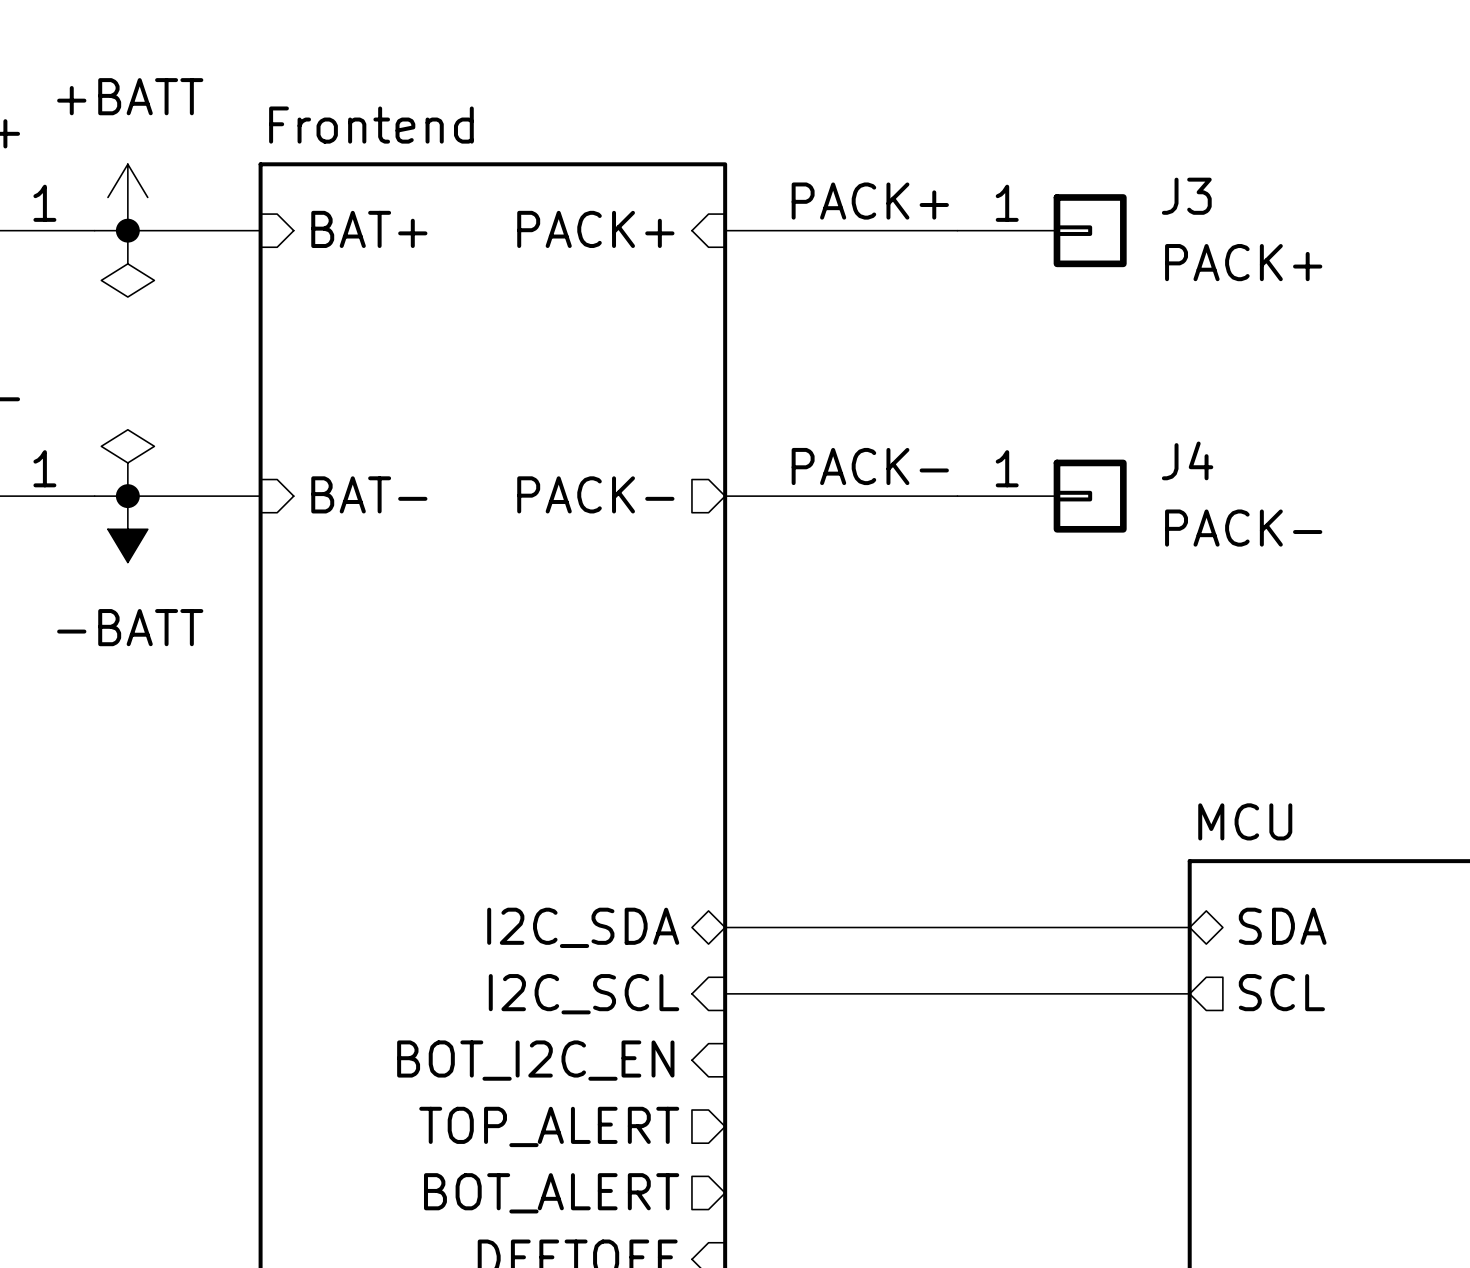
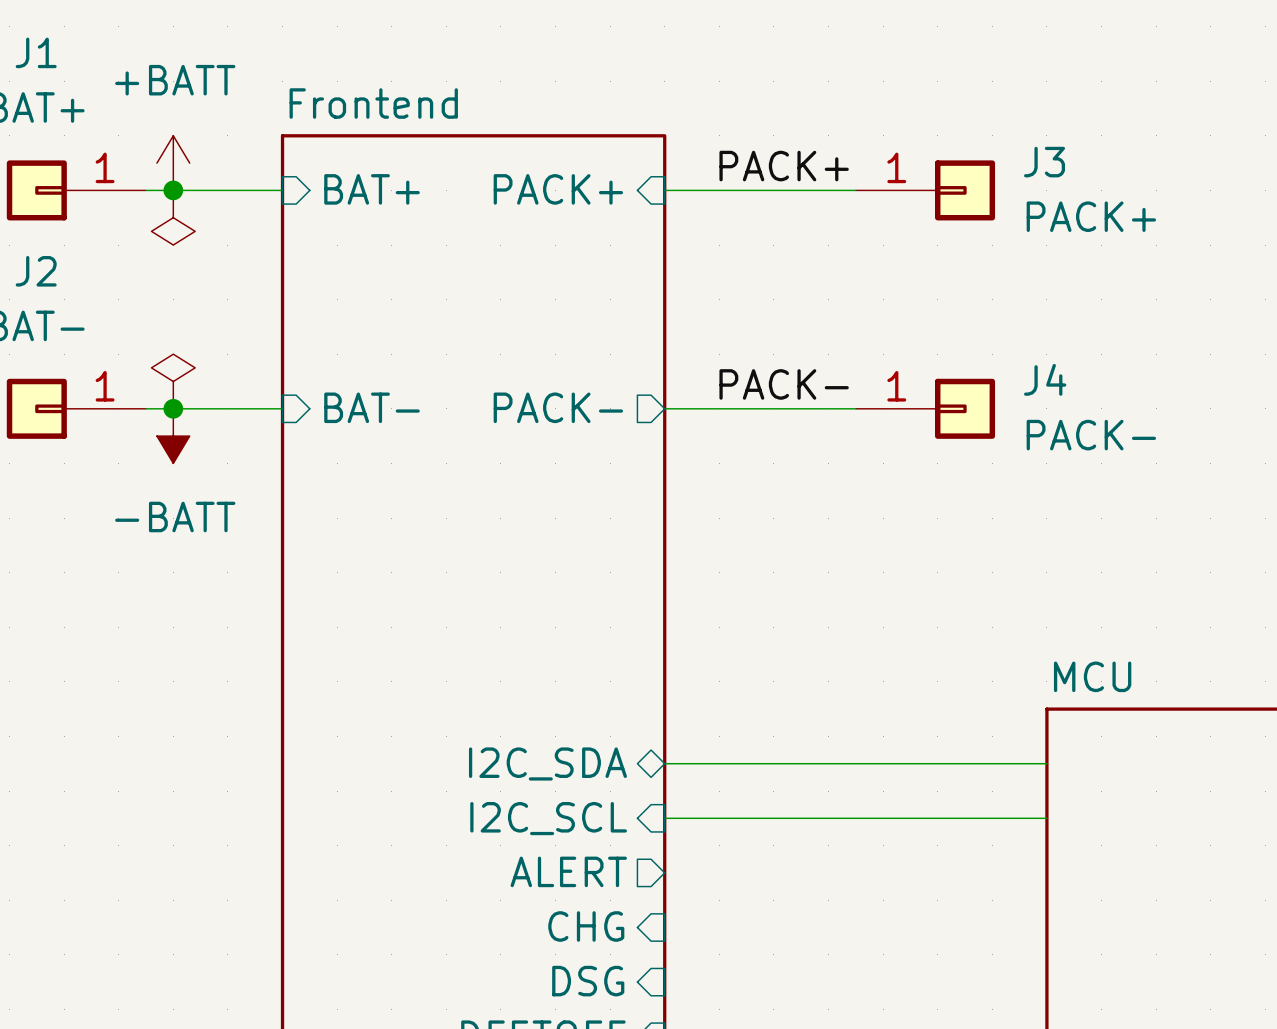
sheet pin: SDA (1282, 926) -> none
sheet pin: SCL (1281, 992) -> none
sheet pin shape: input (535, 1060) -> output (568, 871)
sheet pin: BOT_I2C_EN (535, 1060) -> ALERT (568, 871)
sheet pin shape: output (549, 1126) -> input (586, 926)
sheet pin: TOP_ALERT (549, 1126) -> CHG (586, 926)
sheet pin shape: output (551, 1193) -> input (588, 981)
sheet pin: BOT_ALERT (551, 1193) -> DSG (588, 981)

